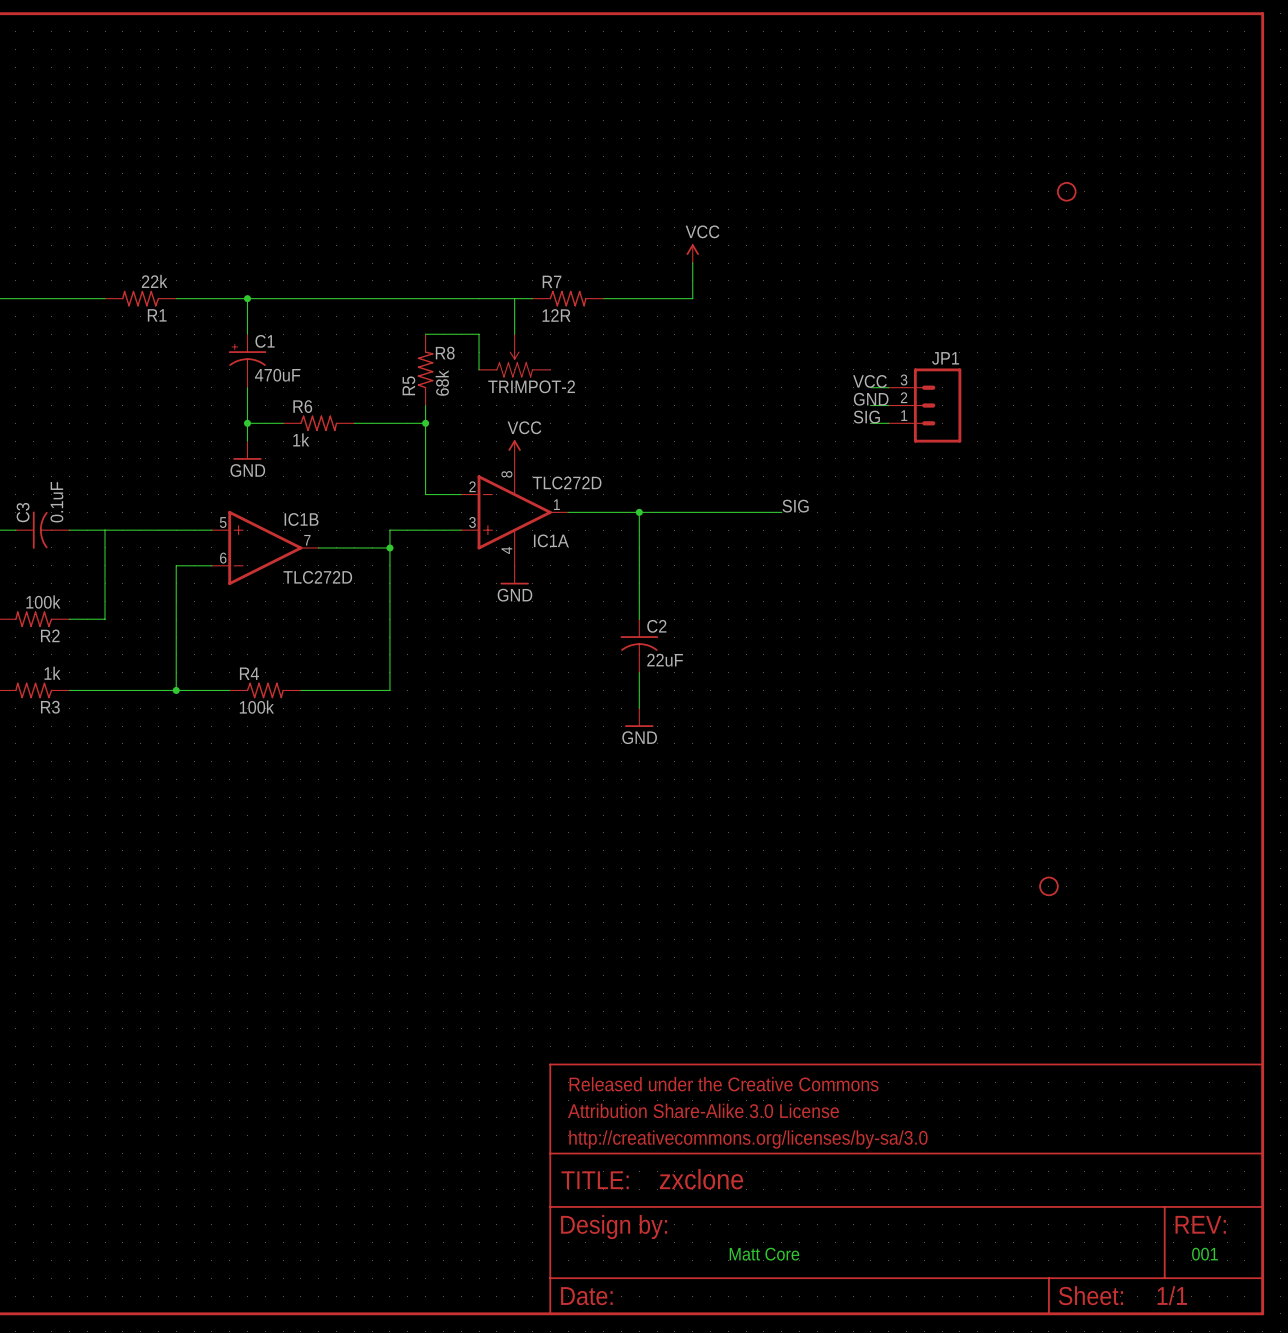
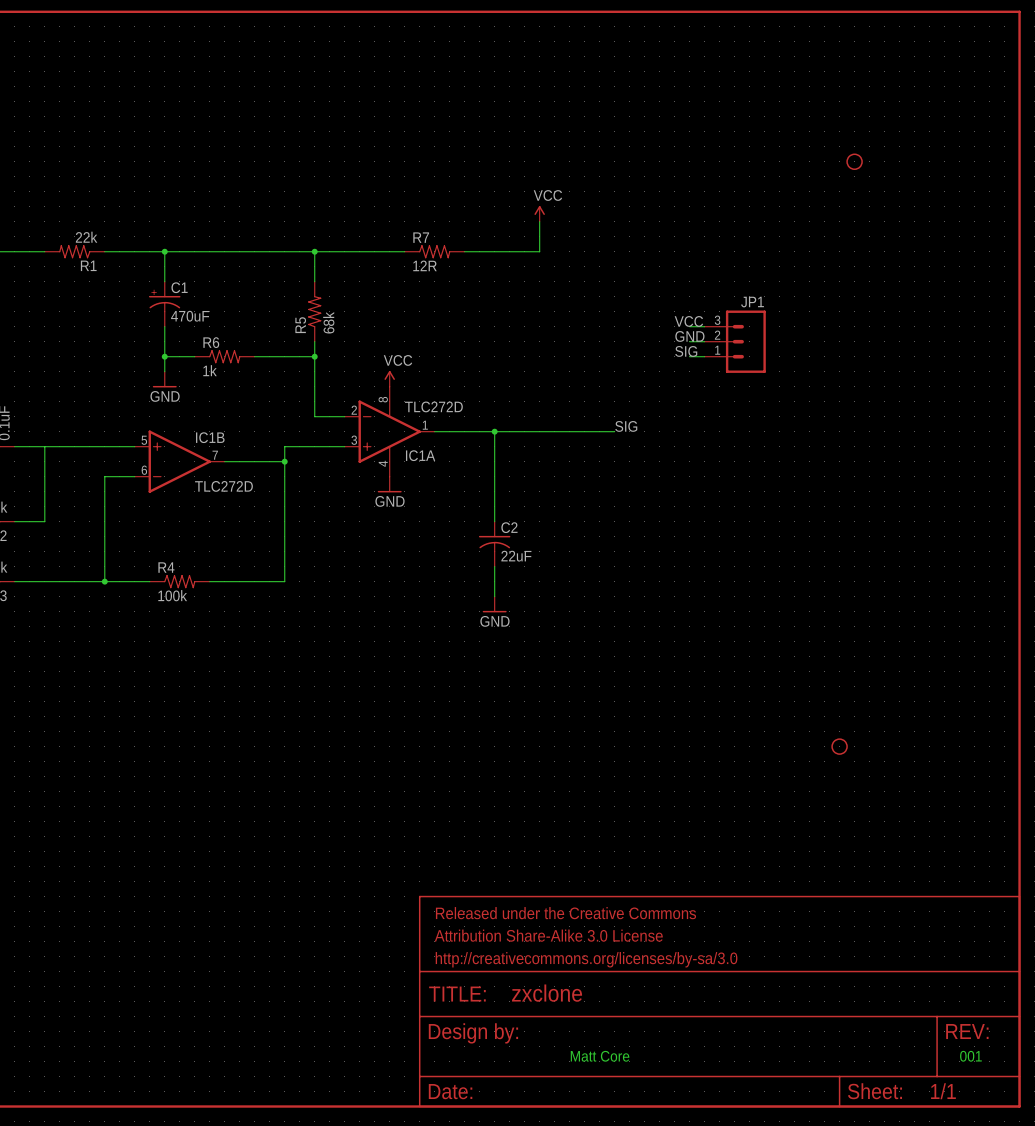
junction: none -> (314, 251)
wire: (514, 298) (514, 334) -> none
wire: (425, 334) (479, 334) (479, 369) -> (314, 281) (314, 251)
R8: TRIMPOT-2 (514, 355) -> none

